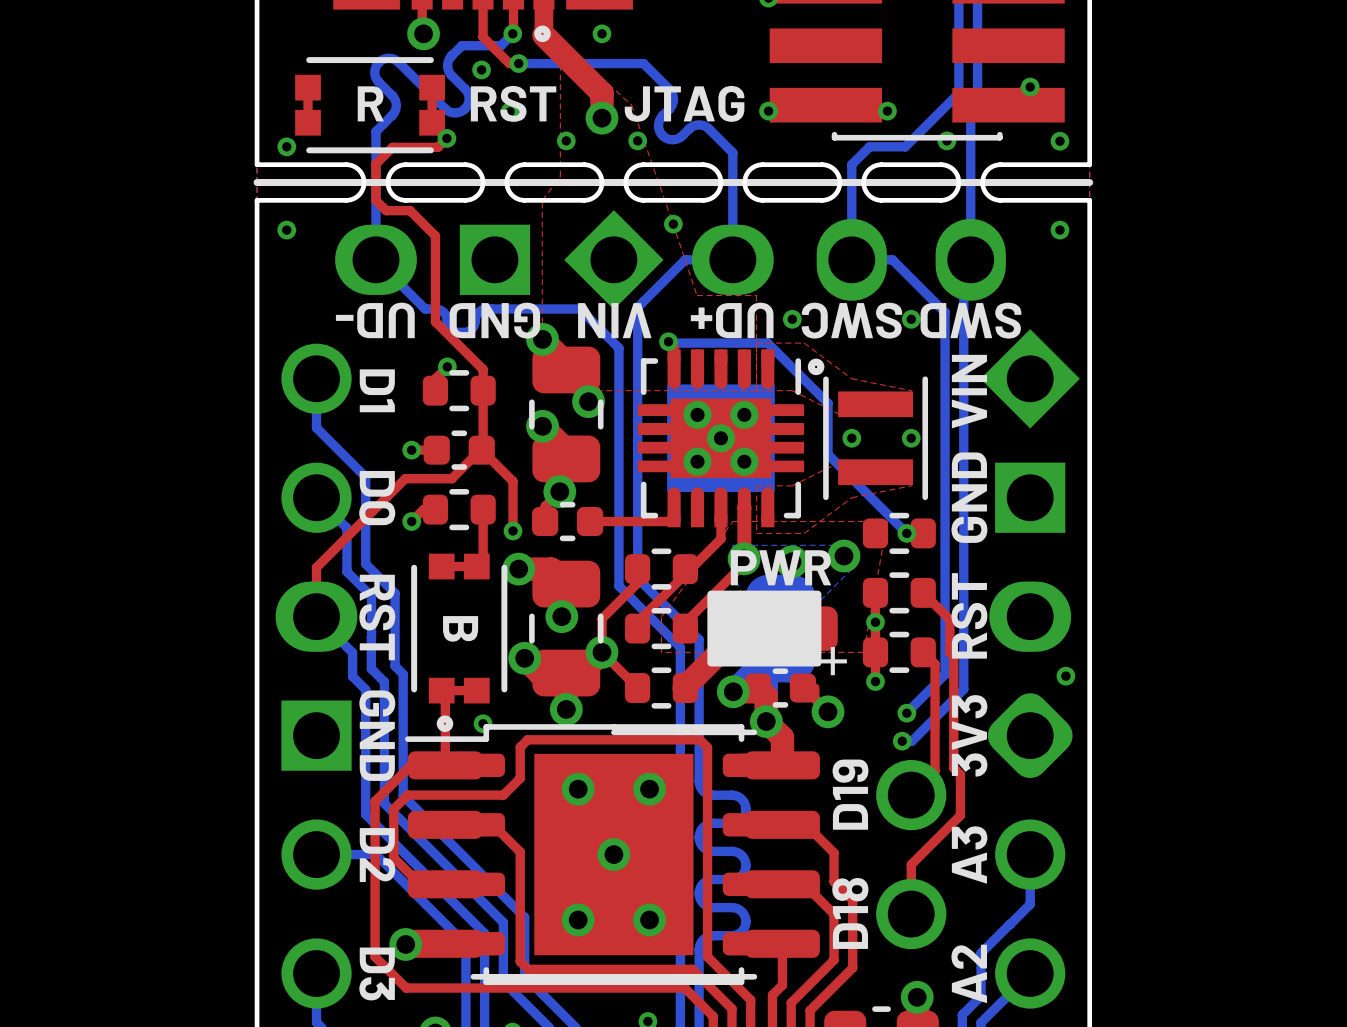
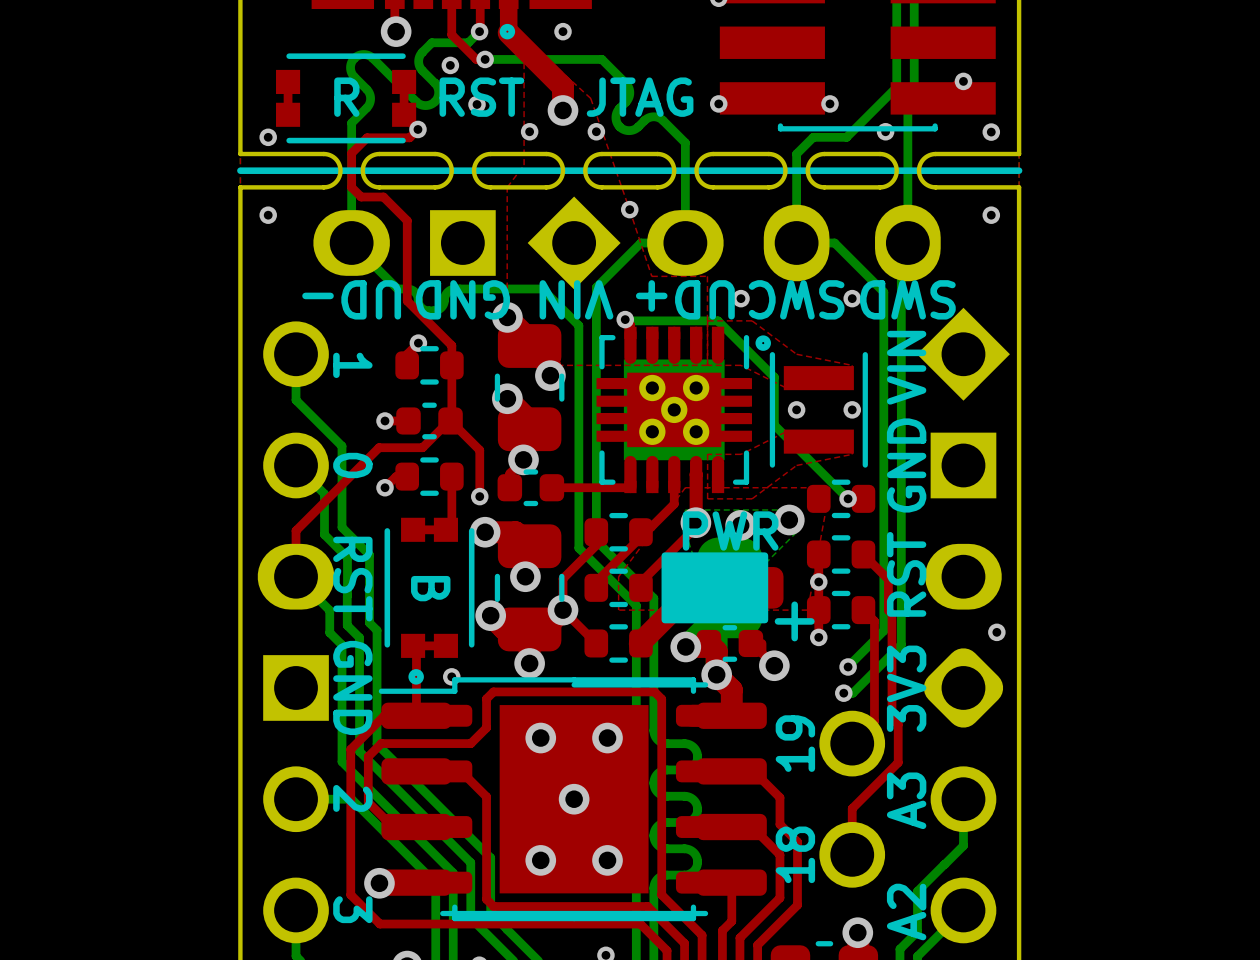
text: D1 (377, 390) -> 1 (352, 365)
text: D0 (377, 498) -> 0 (352, 465)
text: D19 (850, 794) -> 19 (795, 743)
text: D2 (377, 855) -> 2 (352, 798)
text: D18 (850, 913) -> 18 (795, 854)
text: D3 (377, 973) -> 3 (352, 909)

